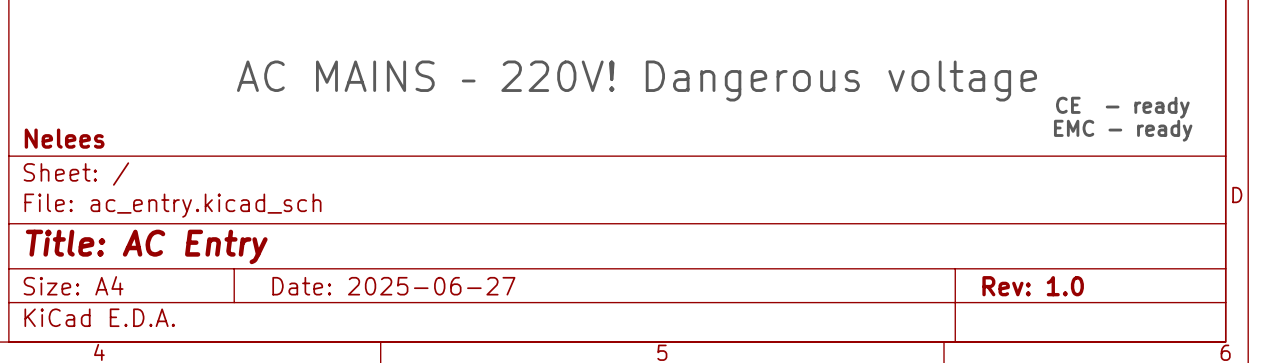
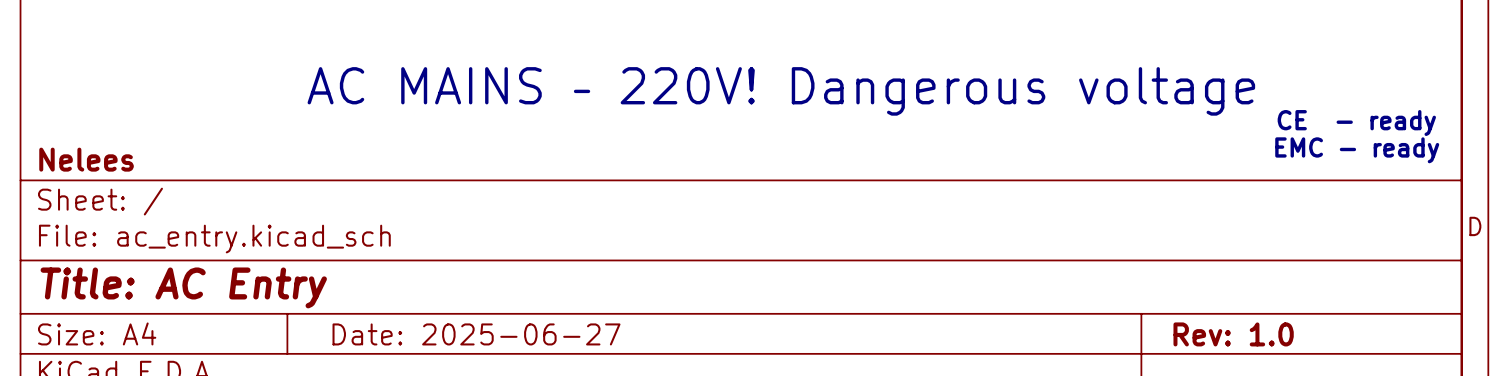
text position: AC MAINS – 220V! Dangerous voltage (636, 80) -> AC MAINS – 220V! Dangerous voltage (781, 91)
text position: CE - ready (1122, 107) -> CE - ready (1356, 123)
text position: EMC - ready (1123, 130) -> EMC - ready (1357, 150)

